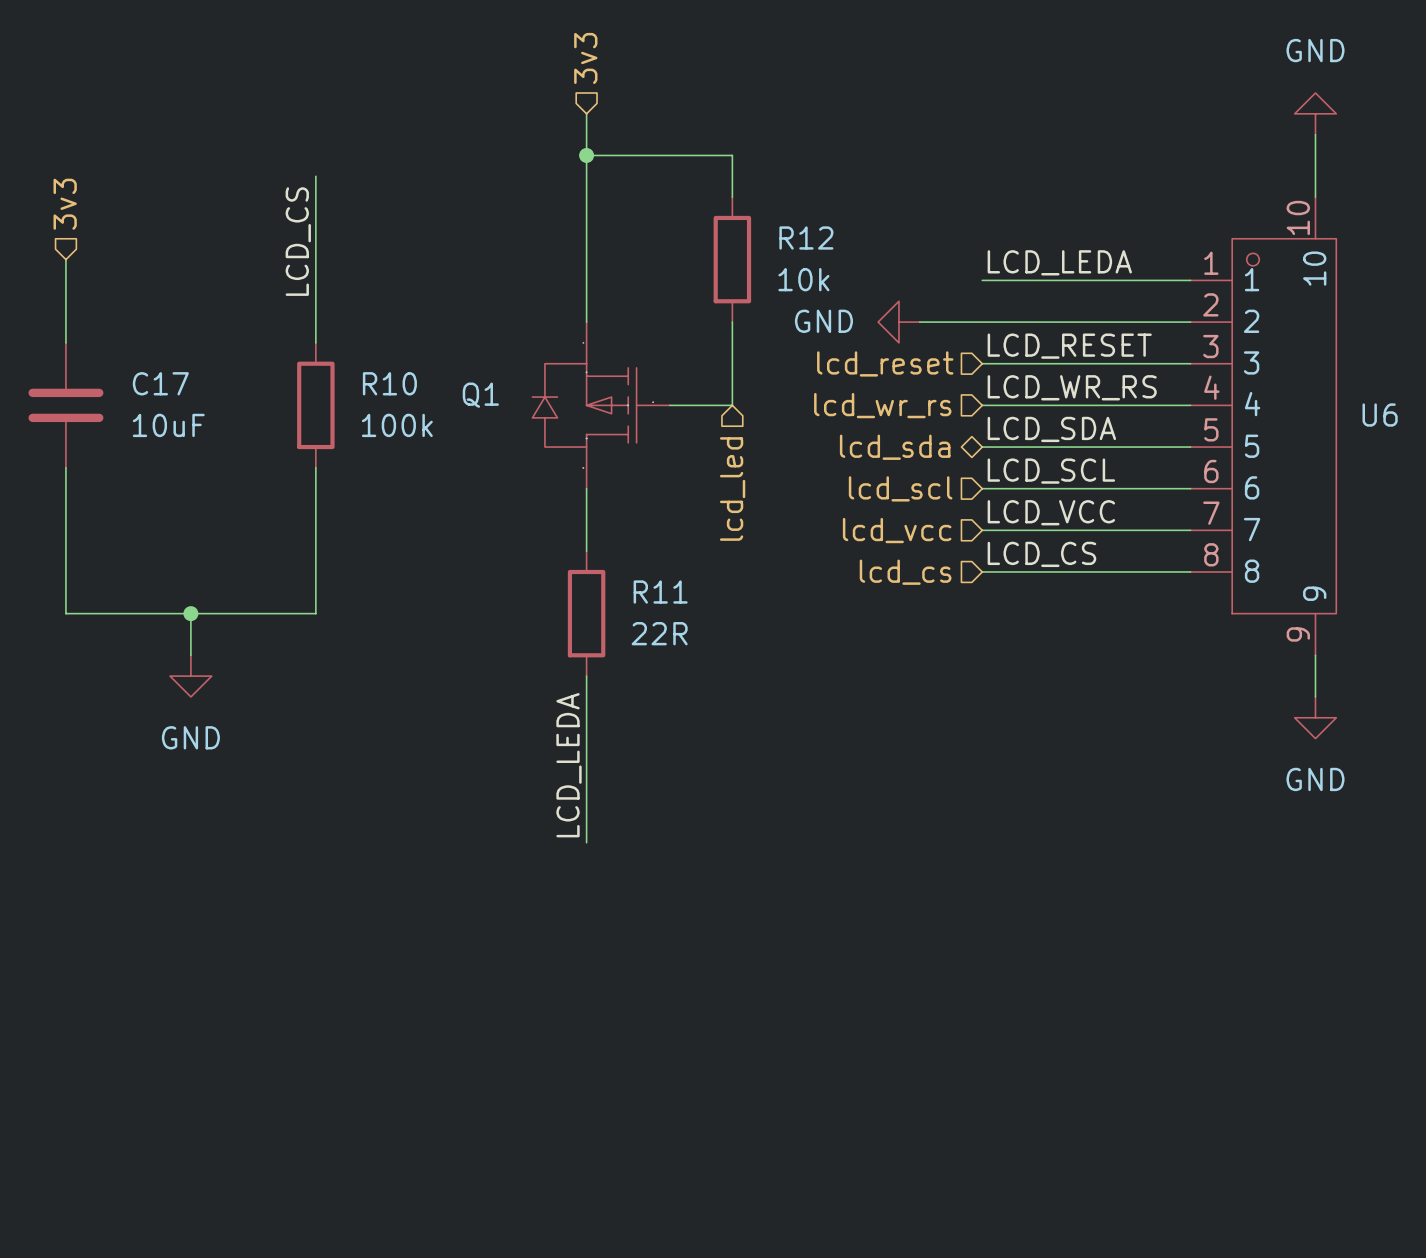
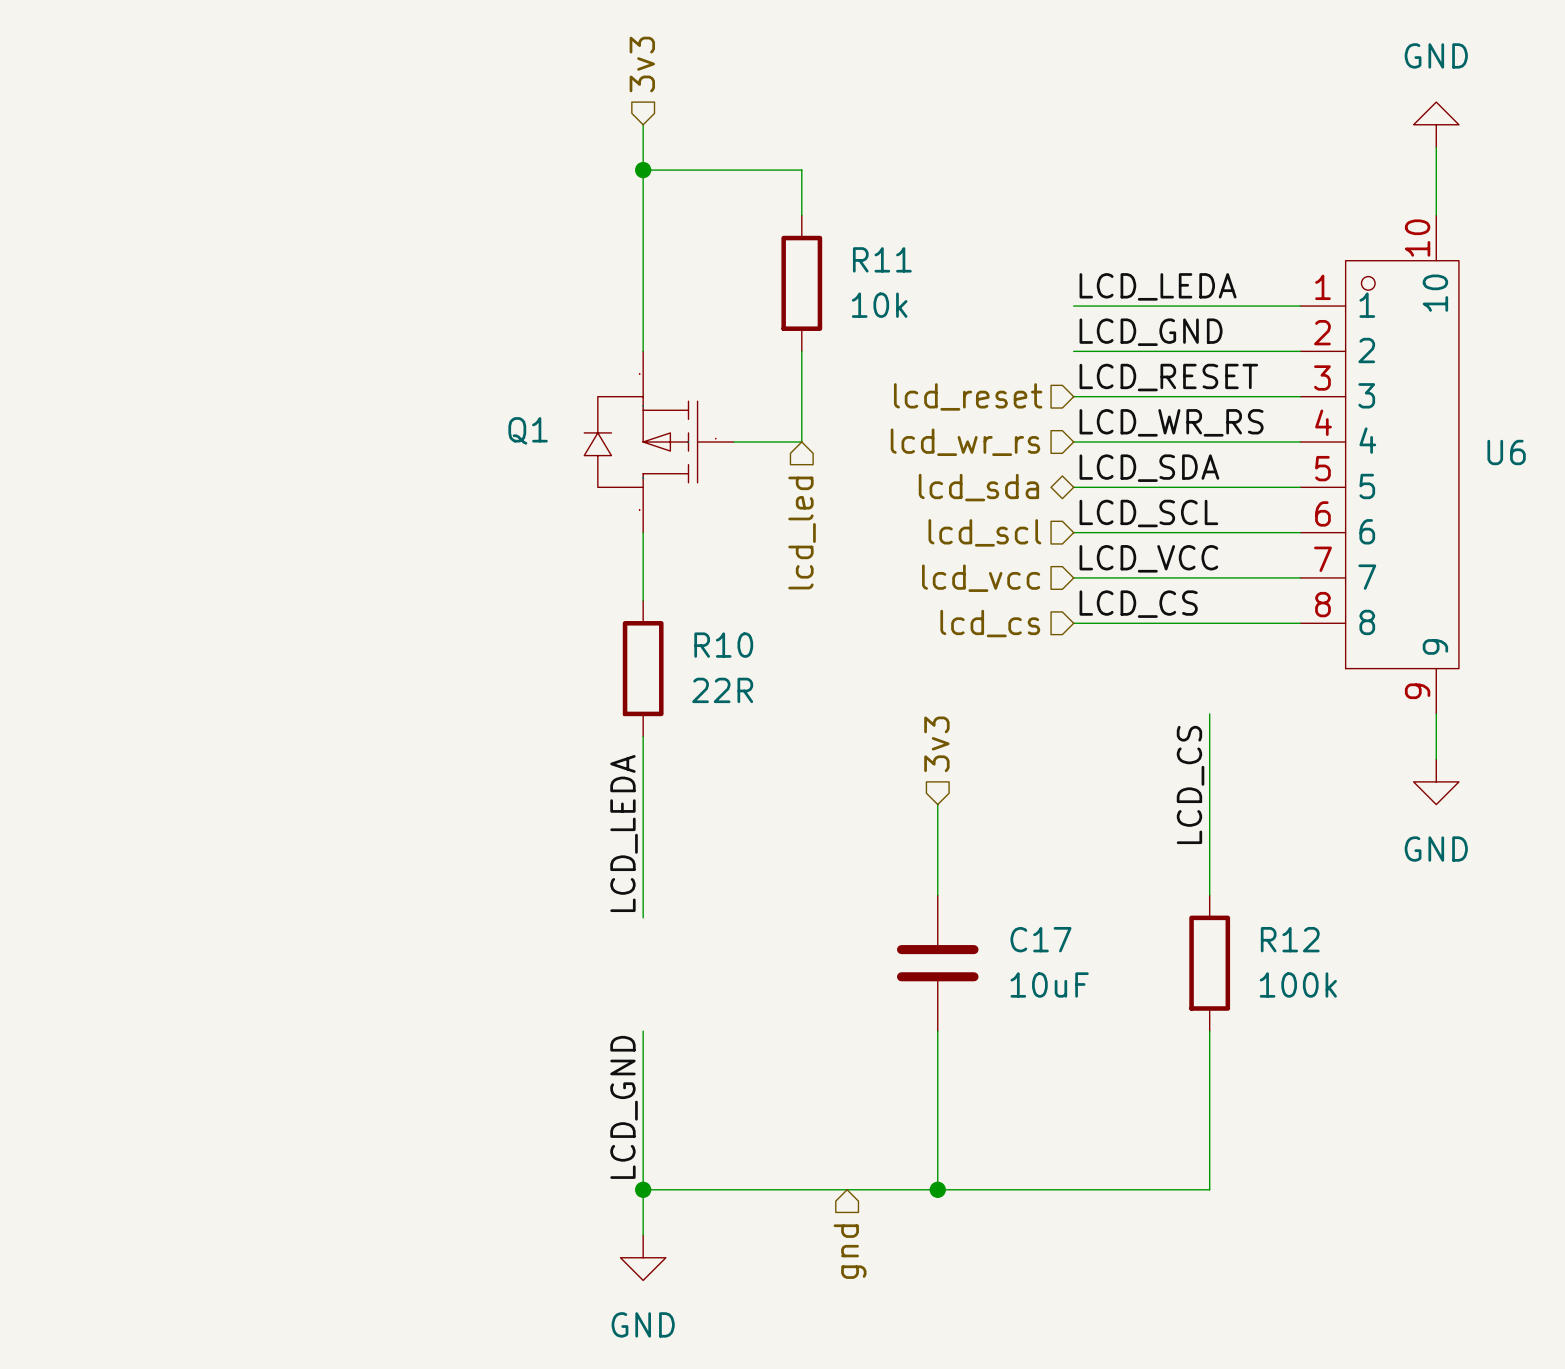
wire: (315, 176) (315, 342) -> none
hierarchical label: 3v3 (65, 204) -> none
R12 name: R12 (806, 237) -> R11 (882, 259)
label: LCD_CS (298, 241) -> none
wire: (65, 259) (65, 342) -> none
label: none -> LCD_GND (1151, 332)
power symbol: GND (898, 322) -> none
wire: (919, 322) (982, 322) -> none
C17 position: (65, 405) -> (937, 963)
R10: 100k (315, 405) -> none
wire: (65, 467) (65, 613) (315, 613) (315, 467) -> none
R11 name: R11 (660, 592) -> R10 (723, 645)
wire: (190, 613) (190, 655) -> none
junction: (190, 613) -> none
wire: none -> (1209, 713) (1209, 895)
power symbol: GND (190, 676) -> none
hierarchical label: none -> 3v3 (936, 744)
label: none -> LCD_CS (1190, 784)
wire: none -> (937, 804) (937, 895)
R12: none -> 100k (1209, 963)
wire: none -> (643, 1031) (643, 1235)
wire: none -> (937, 1031) (937, 1189)
wire: none -> (1209, 1031) (1209, 1189) (643, 1189)
label: none -> LCD_GND (624, 1107)
junction: none -> (643, 1189)
junction: none -> (937, 1189)
hierarchical label: none -> gnd (850, 1251)
power symbol: none -> GND (643, 1257)

